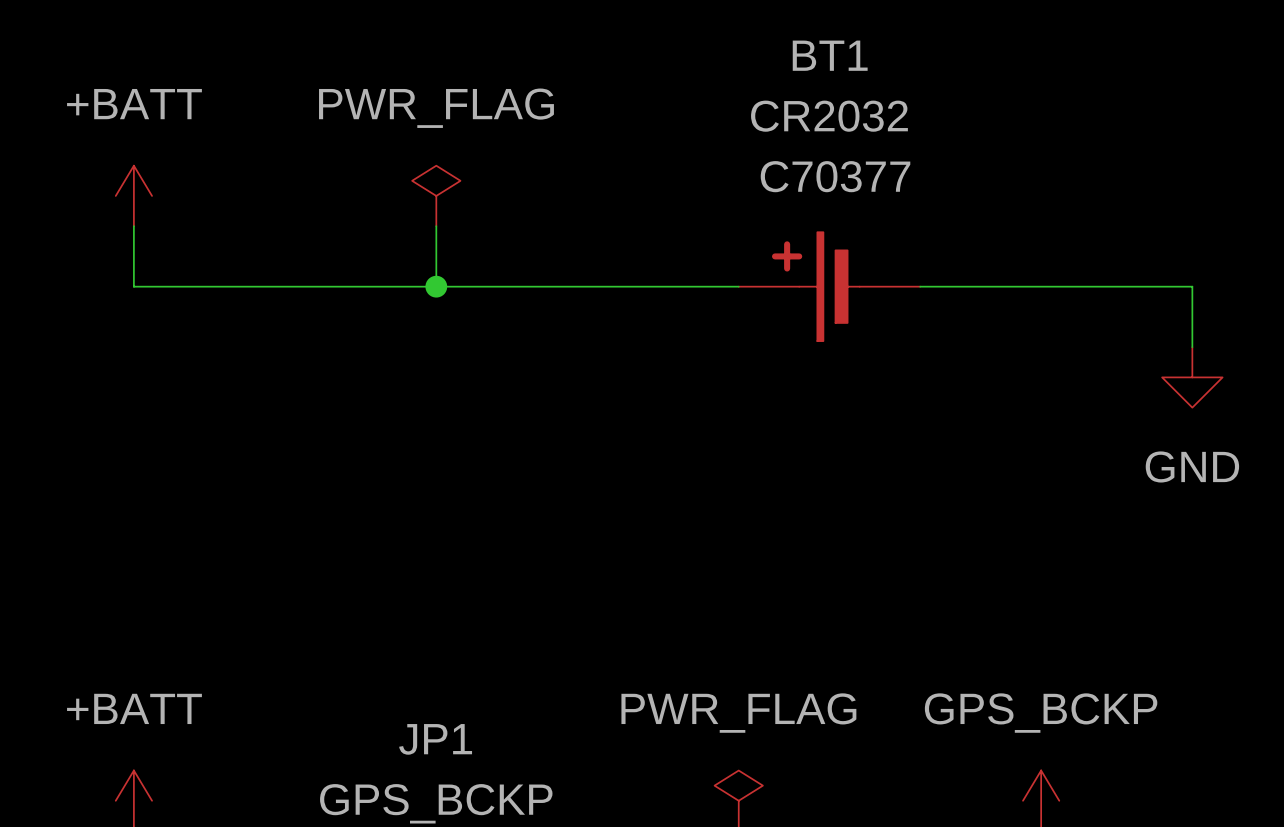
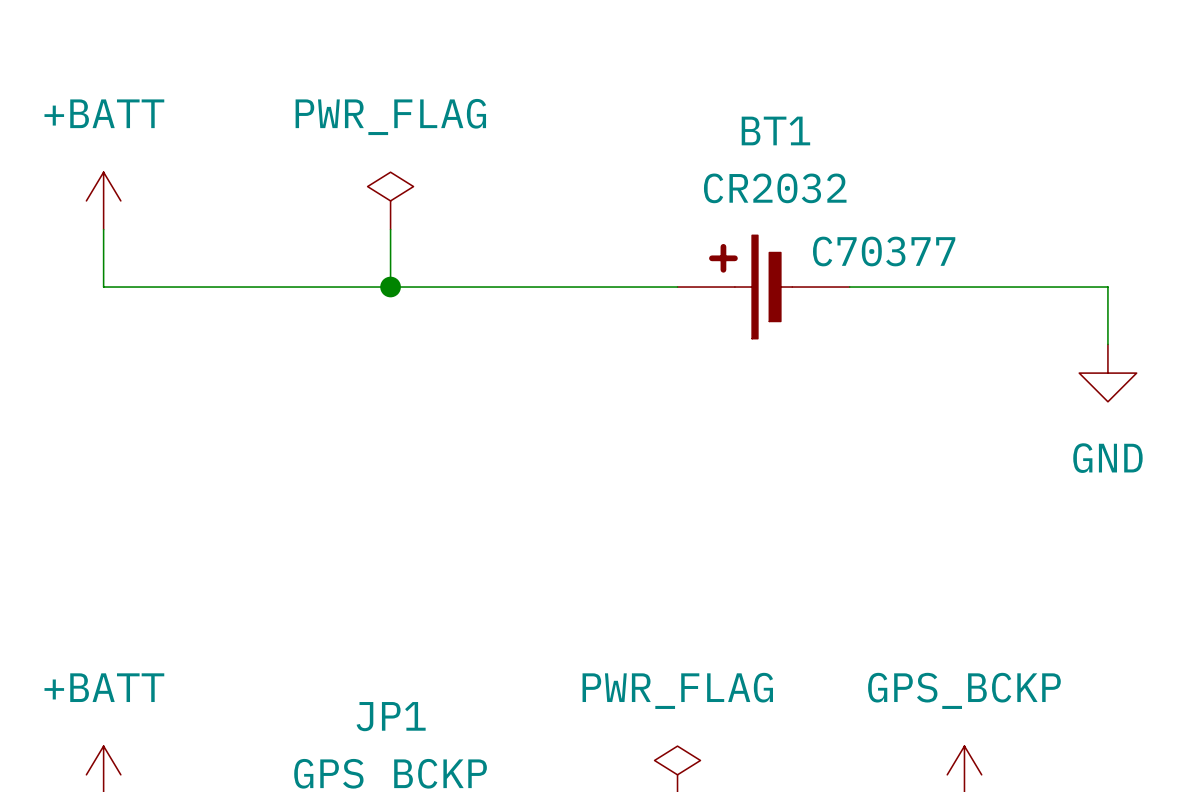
BT1 name position: BT1 (830, 55) -> BT1 (775, 130)
BT1 value position: CR2032 (829, 116) -> CR2032 (775, 188)
BT1 text position: C70377 (835, 176) -> C70377 (884, 251)

